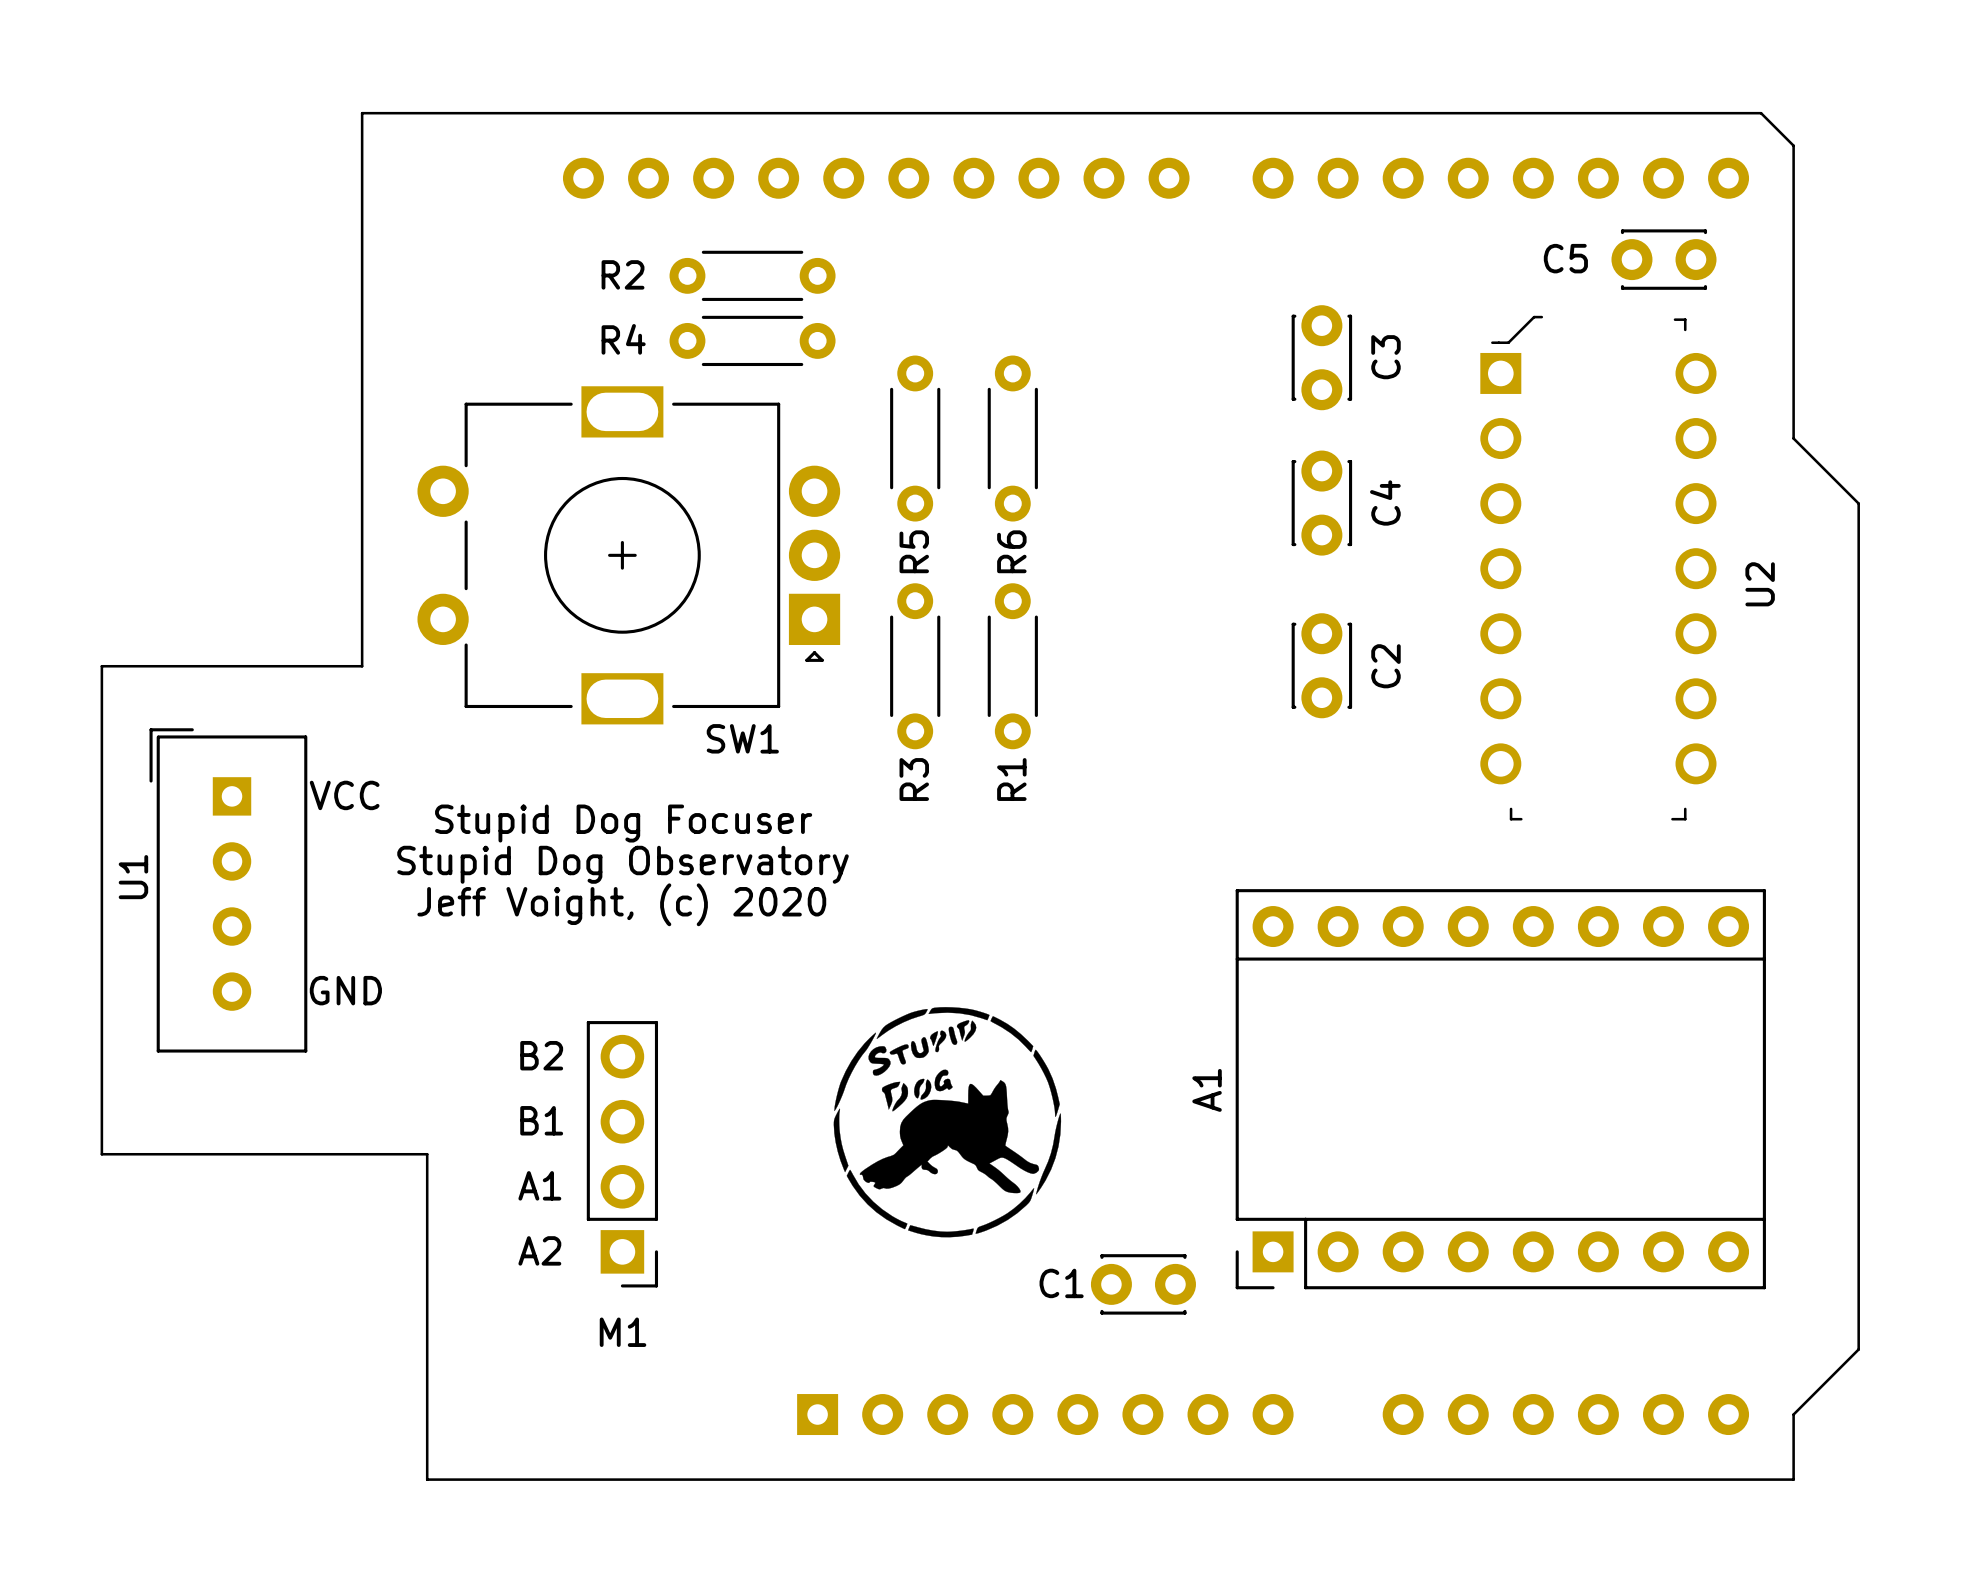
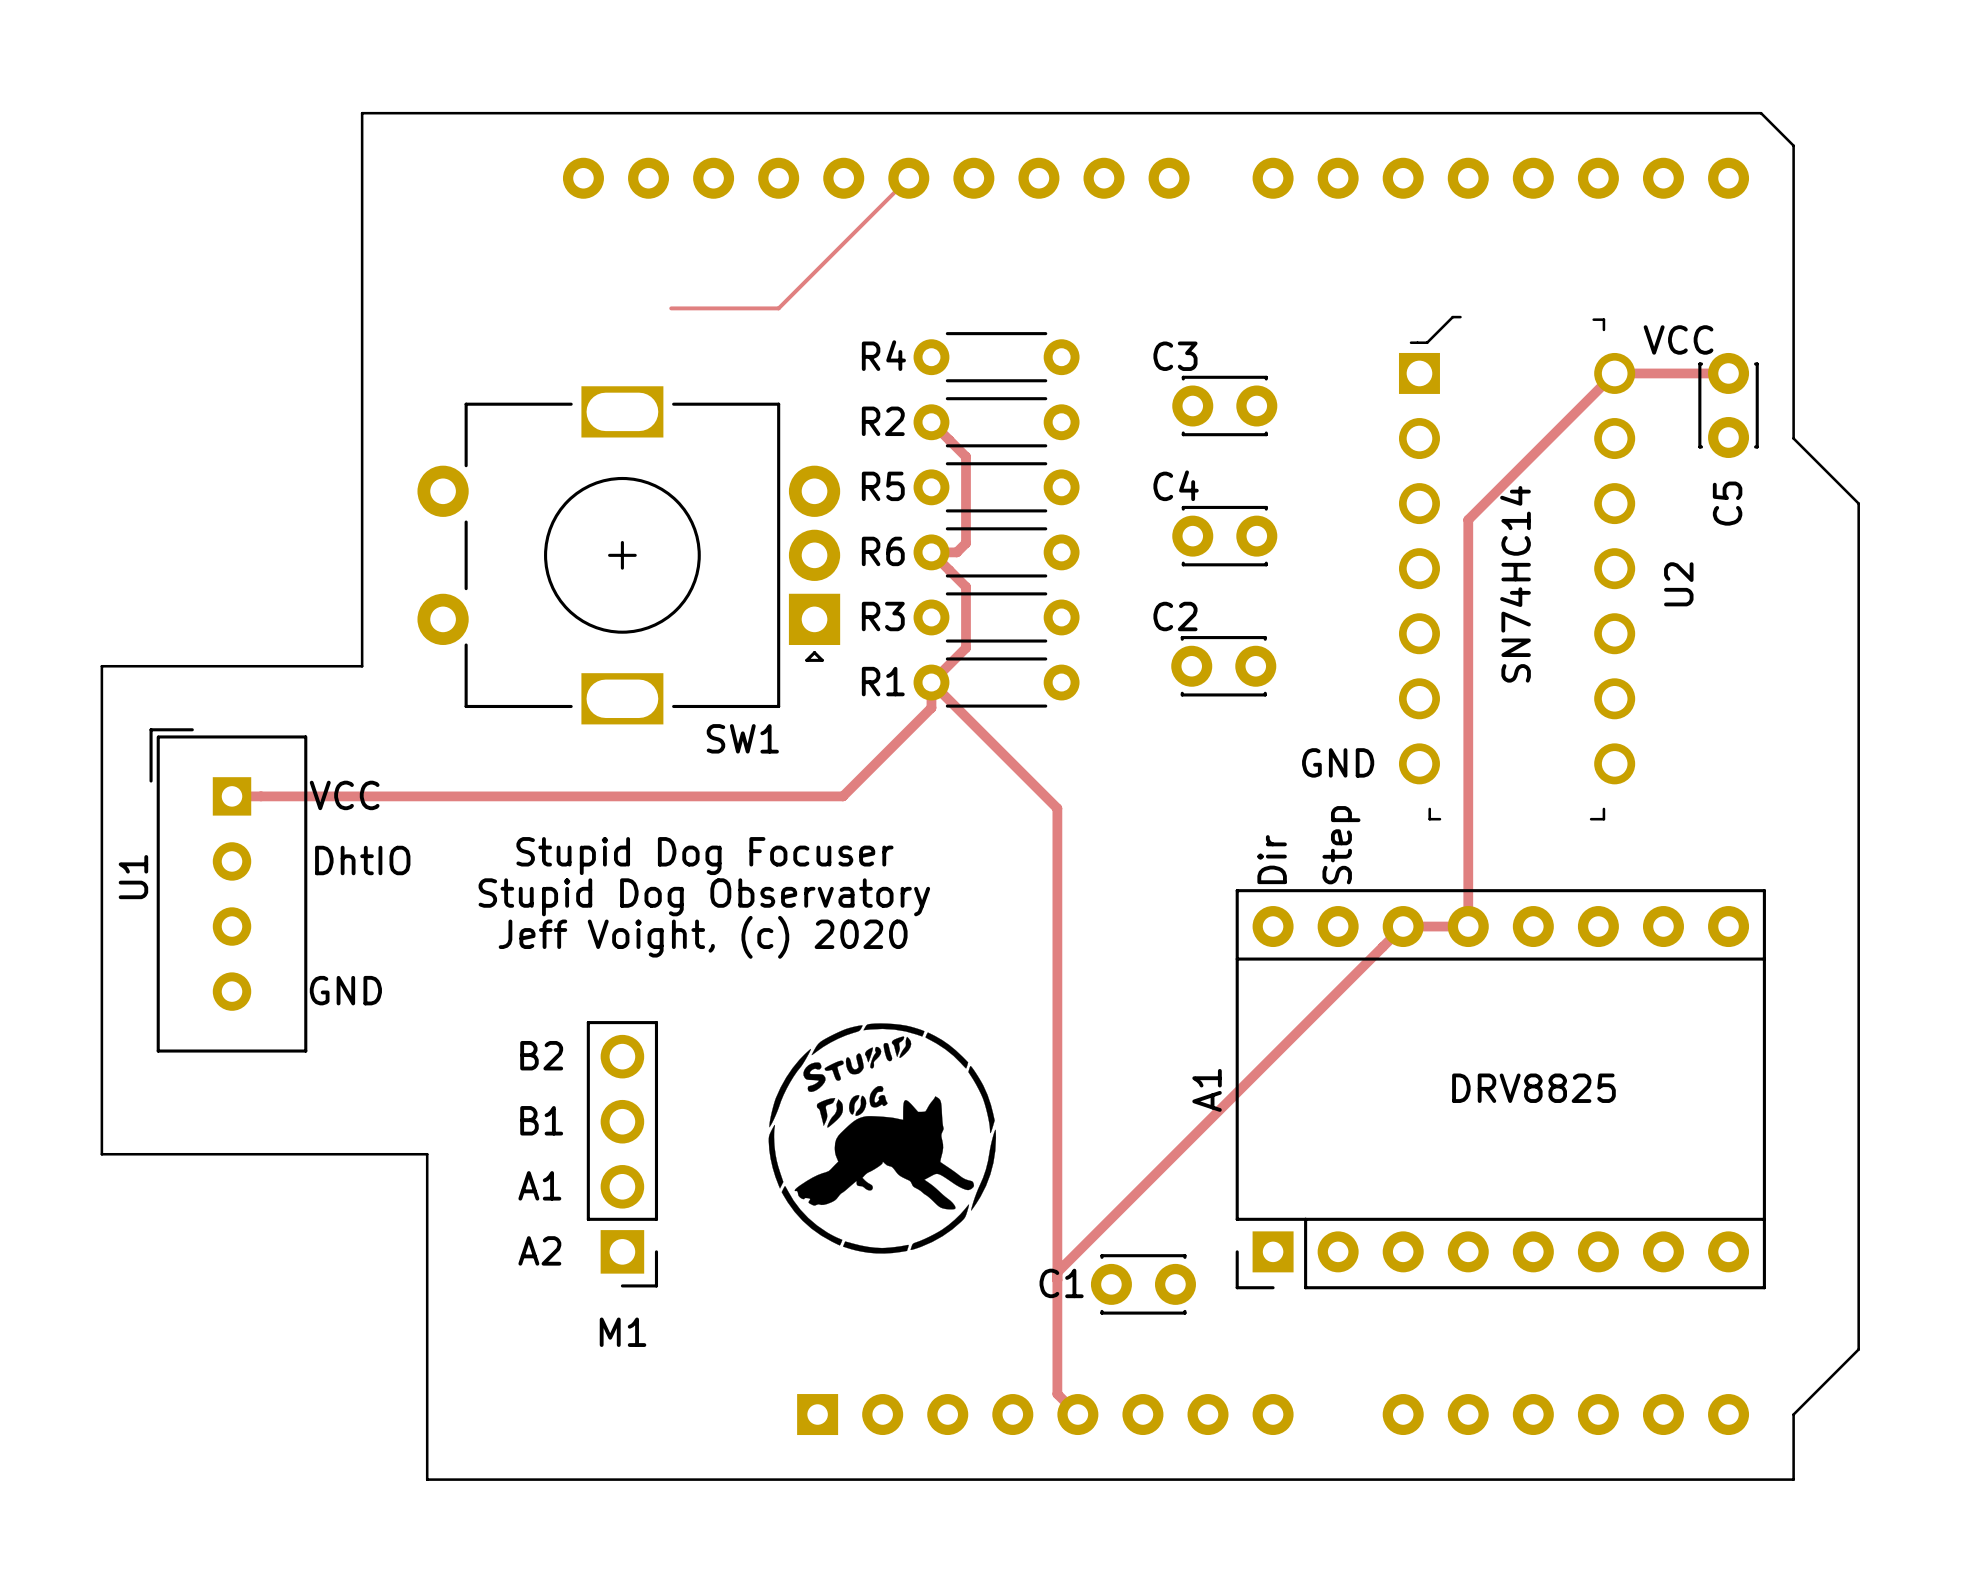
track: none -> (908, 178) (778, 308) (671, 308)
C5 name position: C5 (1565, 258) -> C5 (1727, 503)
C5 rotation: 0° (1663, 259) -> 90° clockwise (1728, 405)
C5 position: (1663, 259) -> (1728, 405)
R2 name position: R2 (623, 274) -> R2 (883, 421)
R2 position: (752, 275) -> (996, 422)
R4 name position: R4 (623, 339) -> R4 (883, 355)
text: none -> VCC (1678, 339)
R4 position: (752, 340) -> (996, 357)
C3 rotation: 0° (1321, 357) -> 90° clockwise (1224, 405)
C3 position: (1321, 357) -> (1224, 405)
C3 name position: C3 (1385, 357) -> C3 (1175, 356)
track: none -> (1728, 373) (1614, 373) (1468, 519) (1468, 926) (1403, 926) (1057, 1272)
track: none -> (931, 422) (966, 456) (966, 543) (956, 552) (931, 552) (966, 586) (966, 648) (931, 682)
R5 rotation: 0° (915, 438) -> 90° clockwise (996, 487)
R6 rotation: 0° (1012, 438) -> 90° clockwise (996, 552)
R6 position: (1012, 438) -> (996, 552)
C4 name position: C4 (1385, 502) -> C4 (1176, 485)
C4 rotation: 0° (1321, 503) -> 90° clockwise (1224, 536)
C4 position: (1321, 503) -> (1224, 536)
U2 position: (1598, 568) -> (1517, 568)
text: none -> SN74HC14 (1515, 584)
C2 rotation: 0° (1321, 665) -> 90° clockwise (1223, 666)
C2 position: (1321, 665) -> (1223, 666)
R3 rotation: 0° (915, 666) -> 90° clockwise (996, 617)
R1 rotation: 0° (1012, 666) -> 90° clockwise (996, 682)
C2 name position: C2 (1385, 666) -> C2 (1175, 616)
track: none -> (931, 682) (1057, 808) (1057, 1394) (1077, 1414)
track: none -> (931, 682) (931, 707) (842, 796) (232, 796)
text: none -> GND (1338, 762)
text position: Stupid Dog Focuser (623, 823) -> Stupid Dog Focuser (704, 856)
text: none -> Step (1341, 845)
text: none -> Dir (1272, 859)
text: none -> DhtIO (362, 860)
text position: Stupid Dog Observatory (623, 864) -> Stupid Dog Observatory (704, 897)
text position: Jeff Voight, (c) 2020 (621, 904) -> Jeff Voight, (c) 2020 (703, 937)
text: none -> DRV8825 (1533, 1088)
drawing position: (947, 1122) -> (882, 1138)

